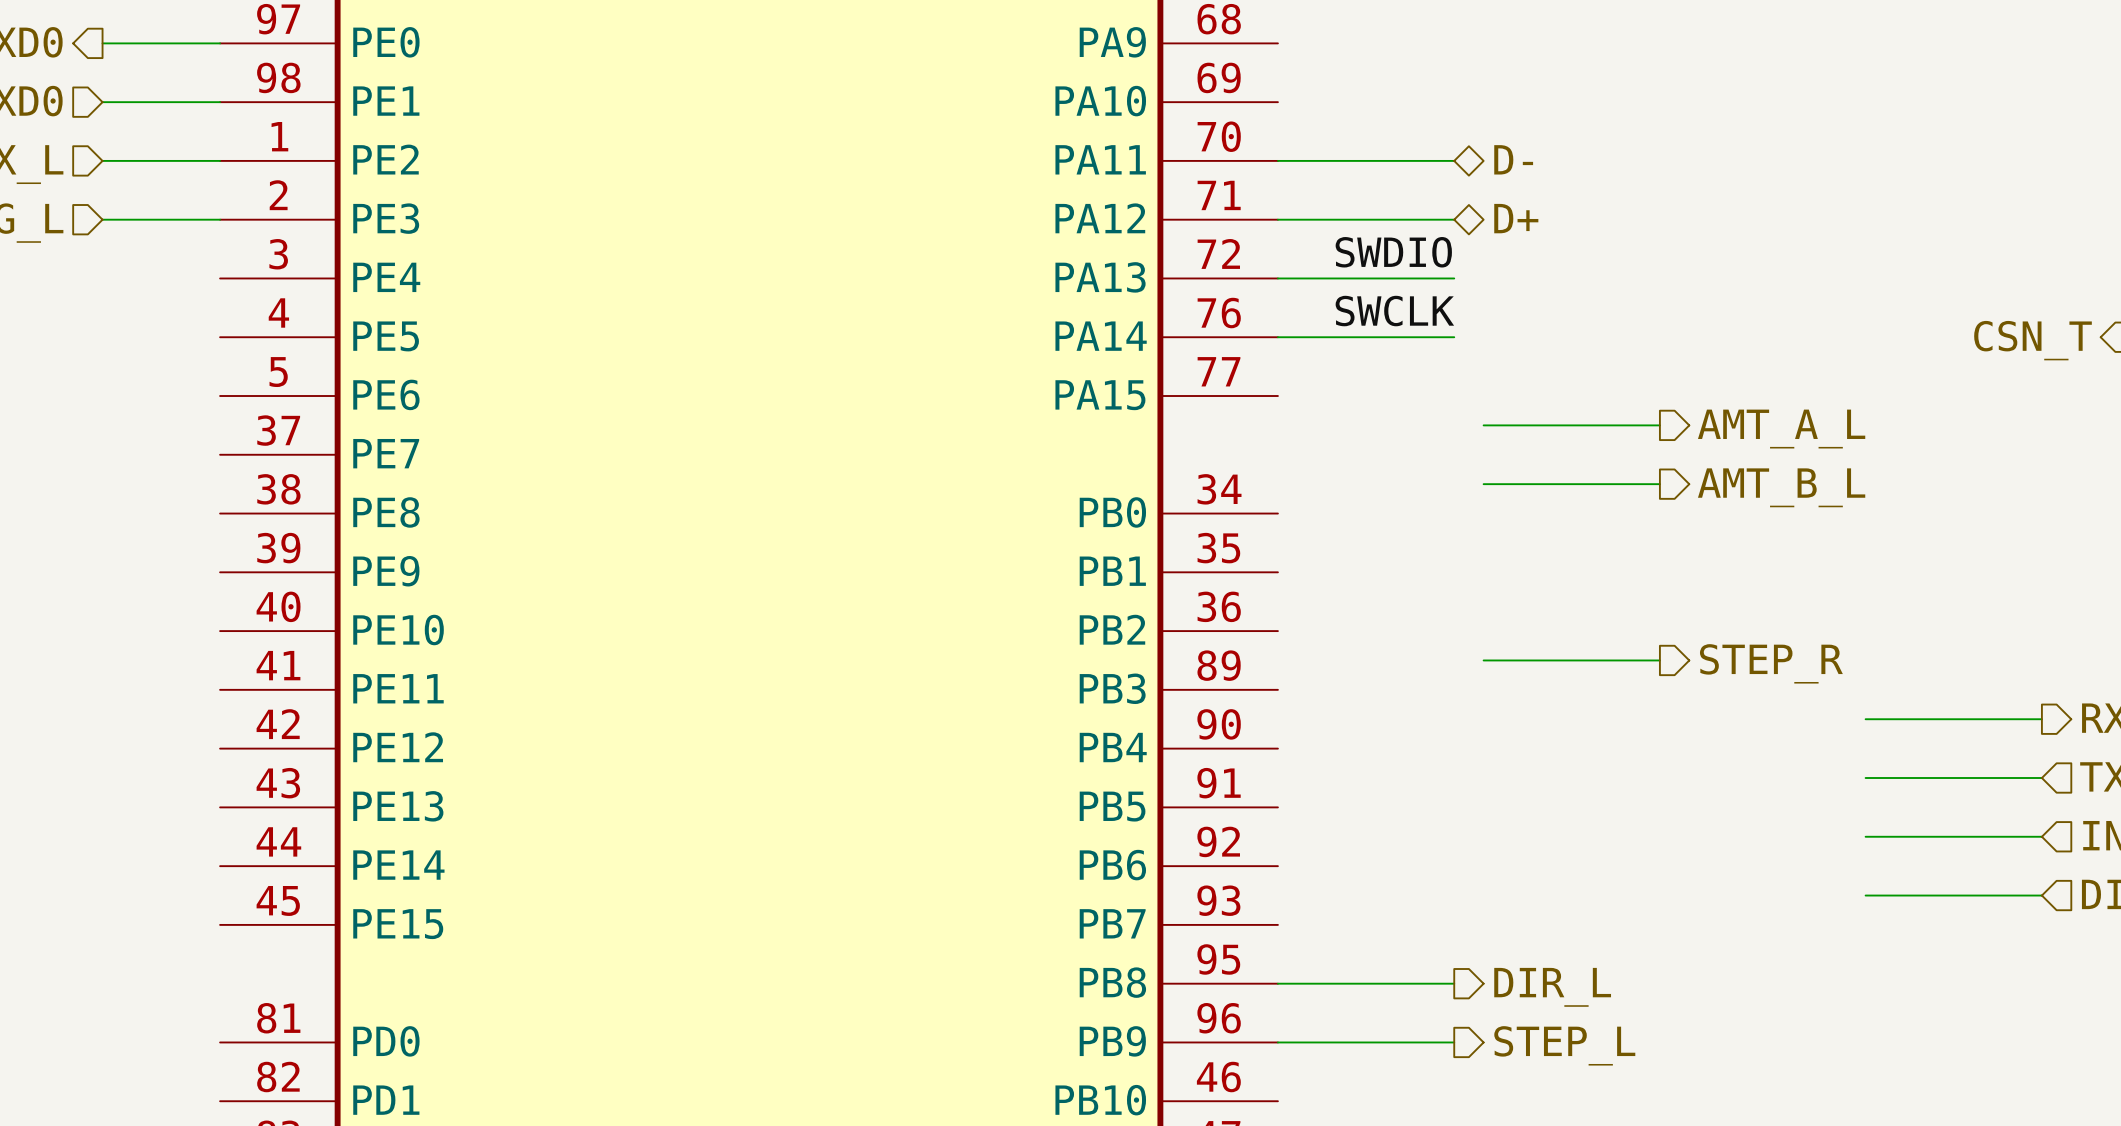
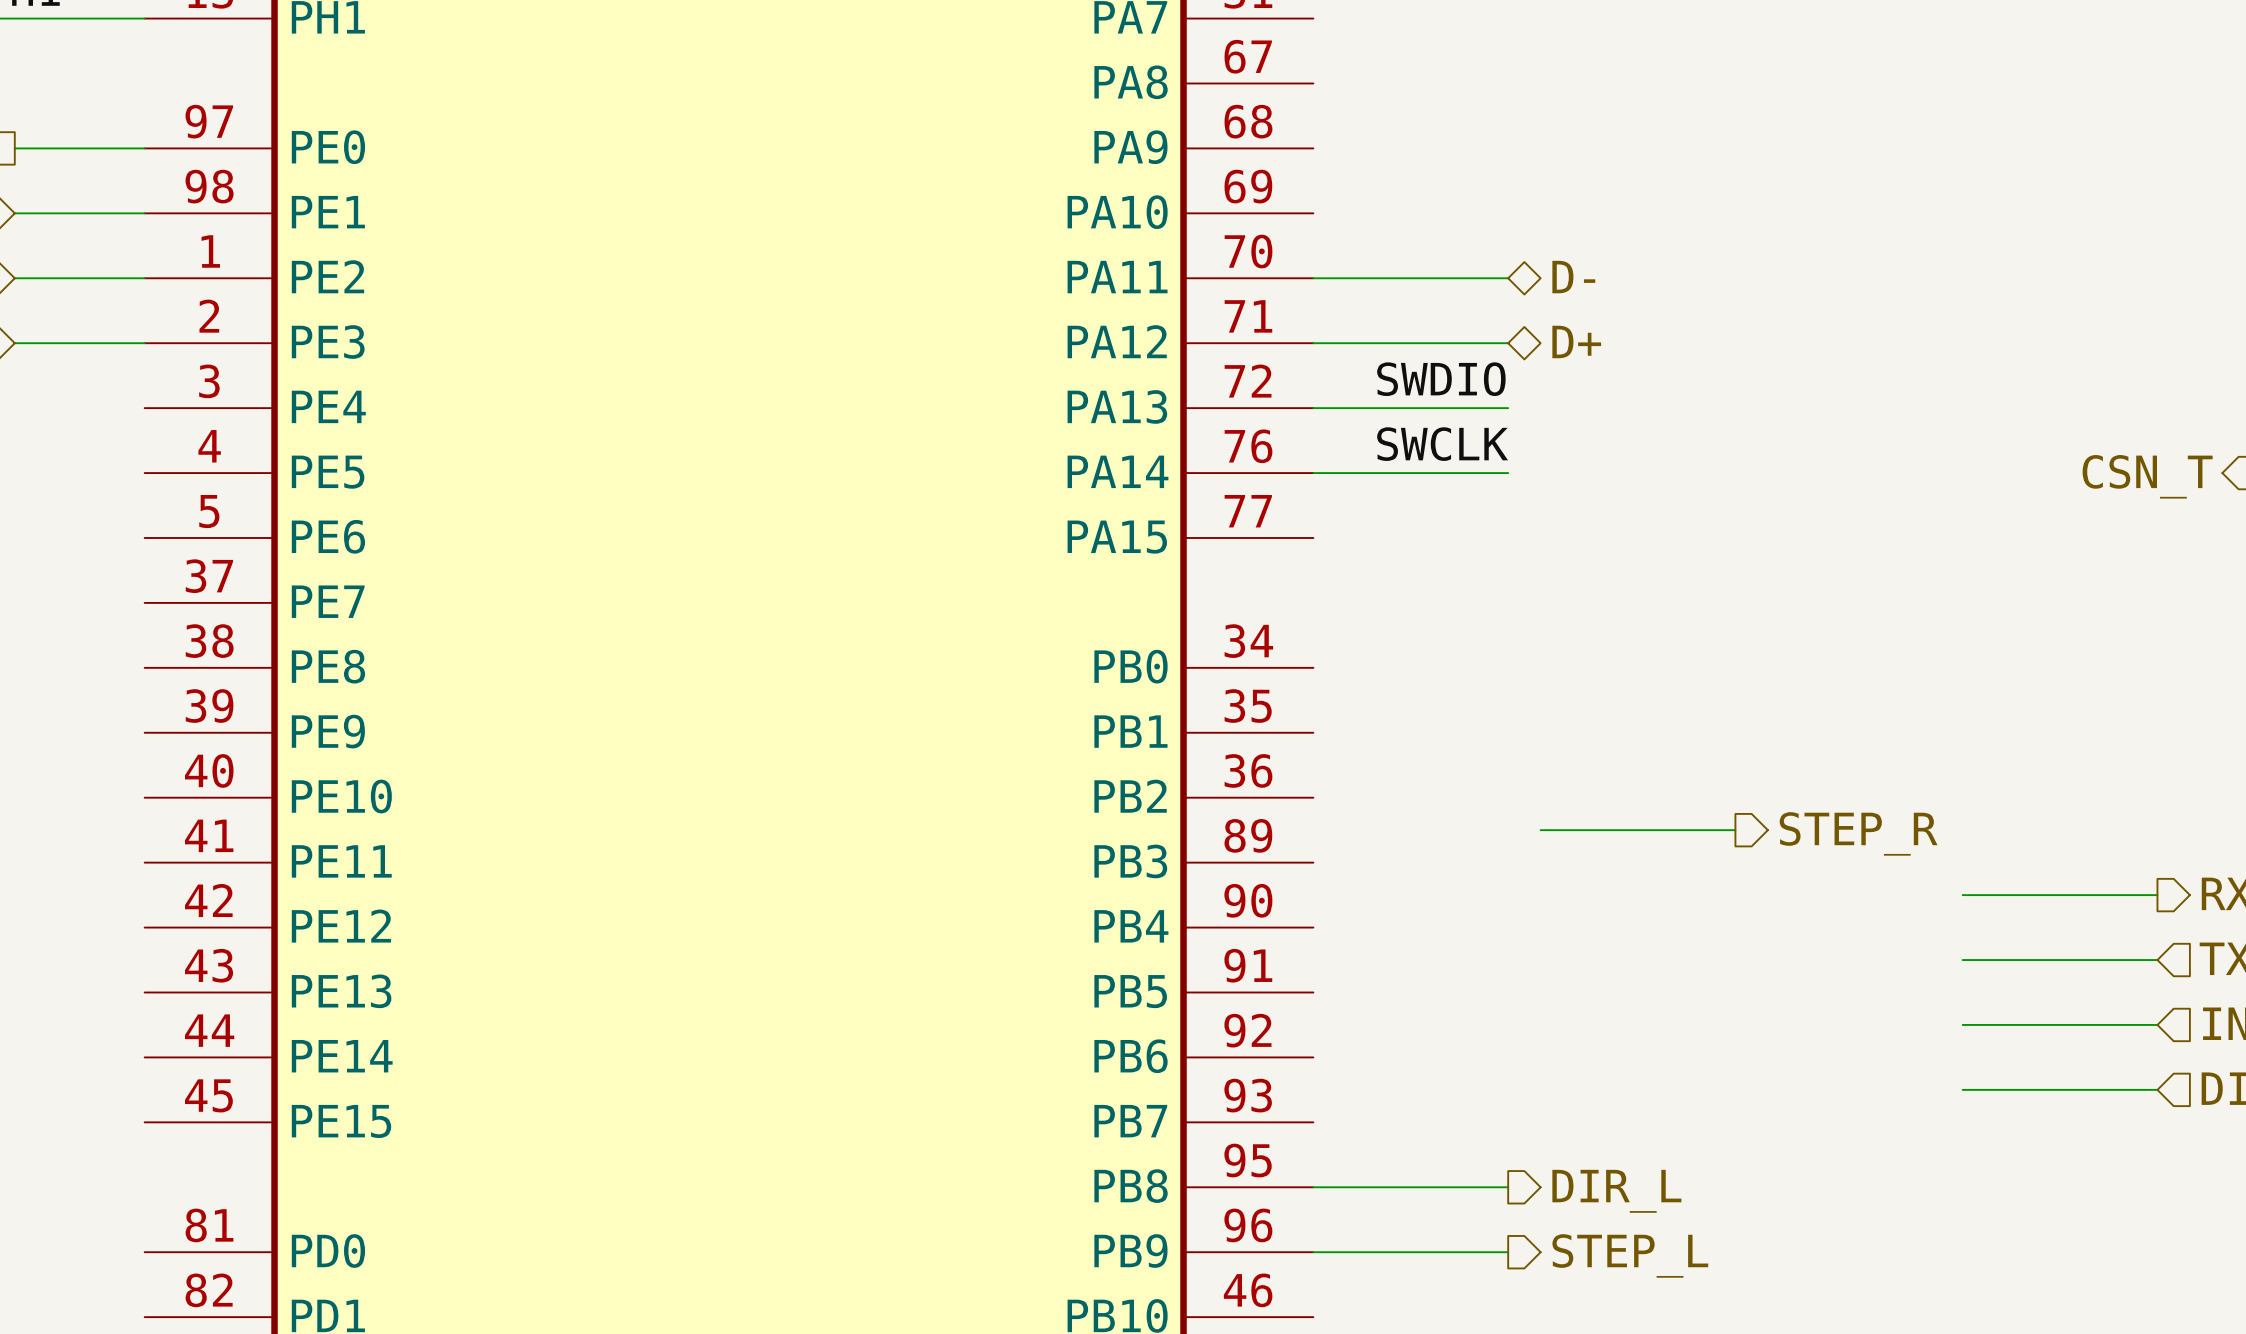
wire: (1483, 425) (1659, 425) -> none
hierarchical label: AMT_A_L (1781, 429) -> none
wire: (1483, 484) (1659, 484) -> none
hierarchical label: AMT_B_L (1781, 487) -> none

